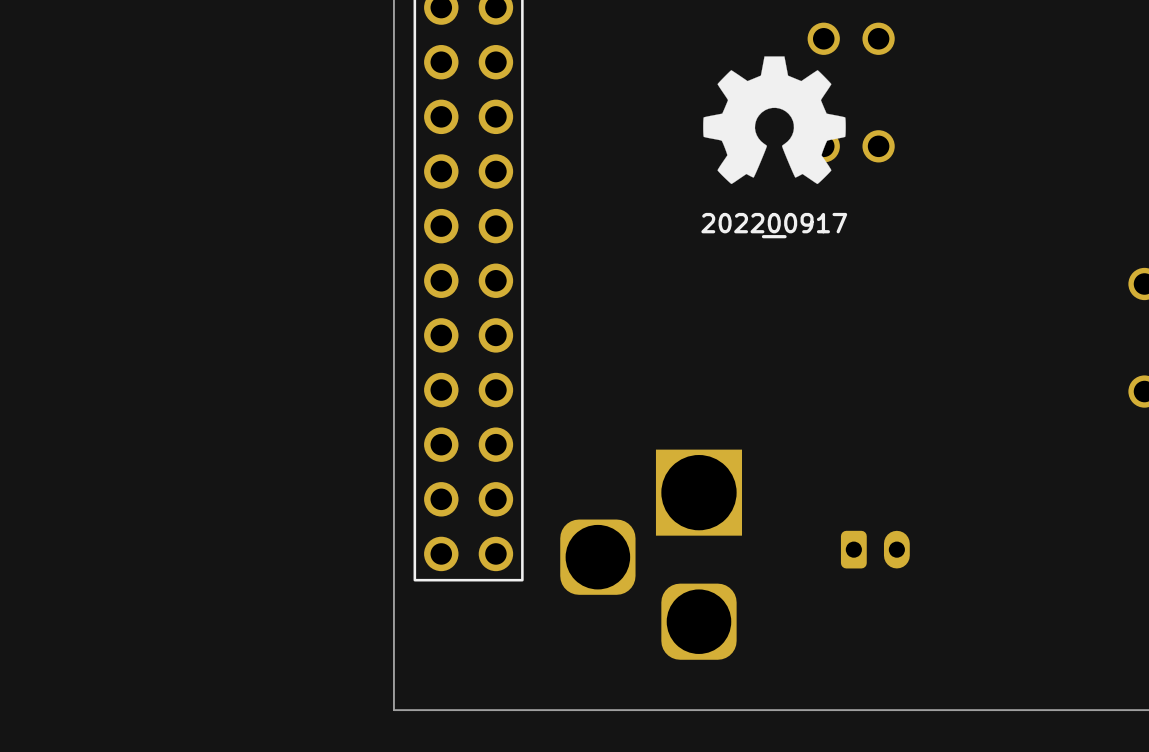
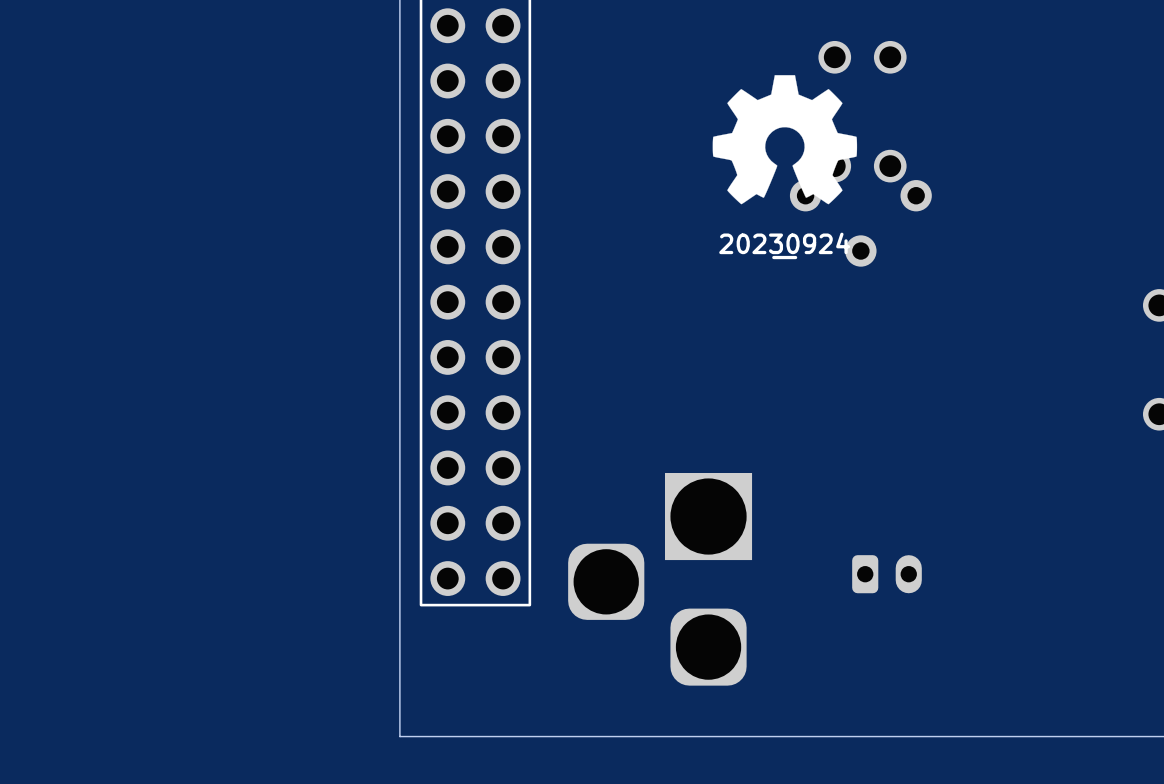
part: none -> (860, 223)
drawing shape: [701, 212, 848, 239] -> [719, 232, 851, 260]

